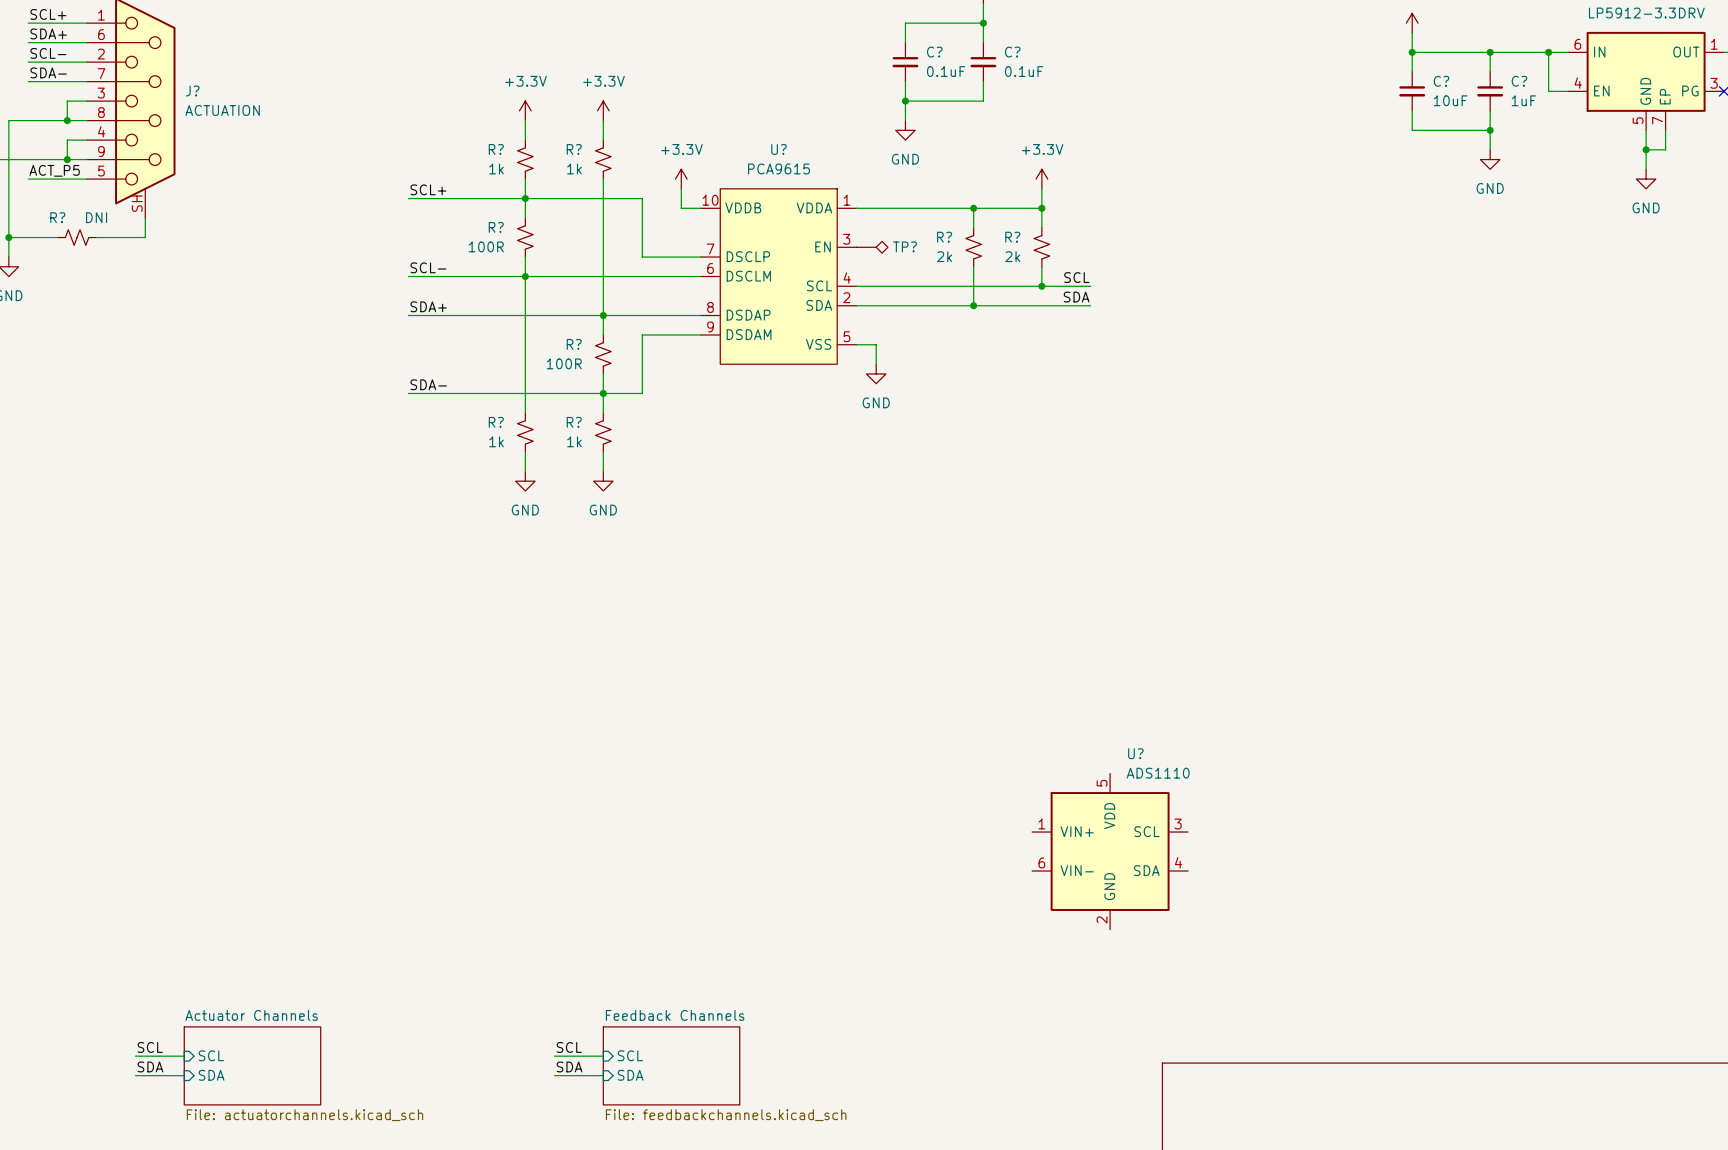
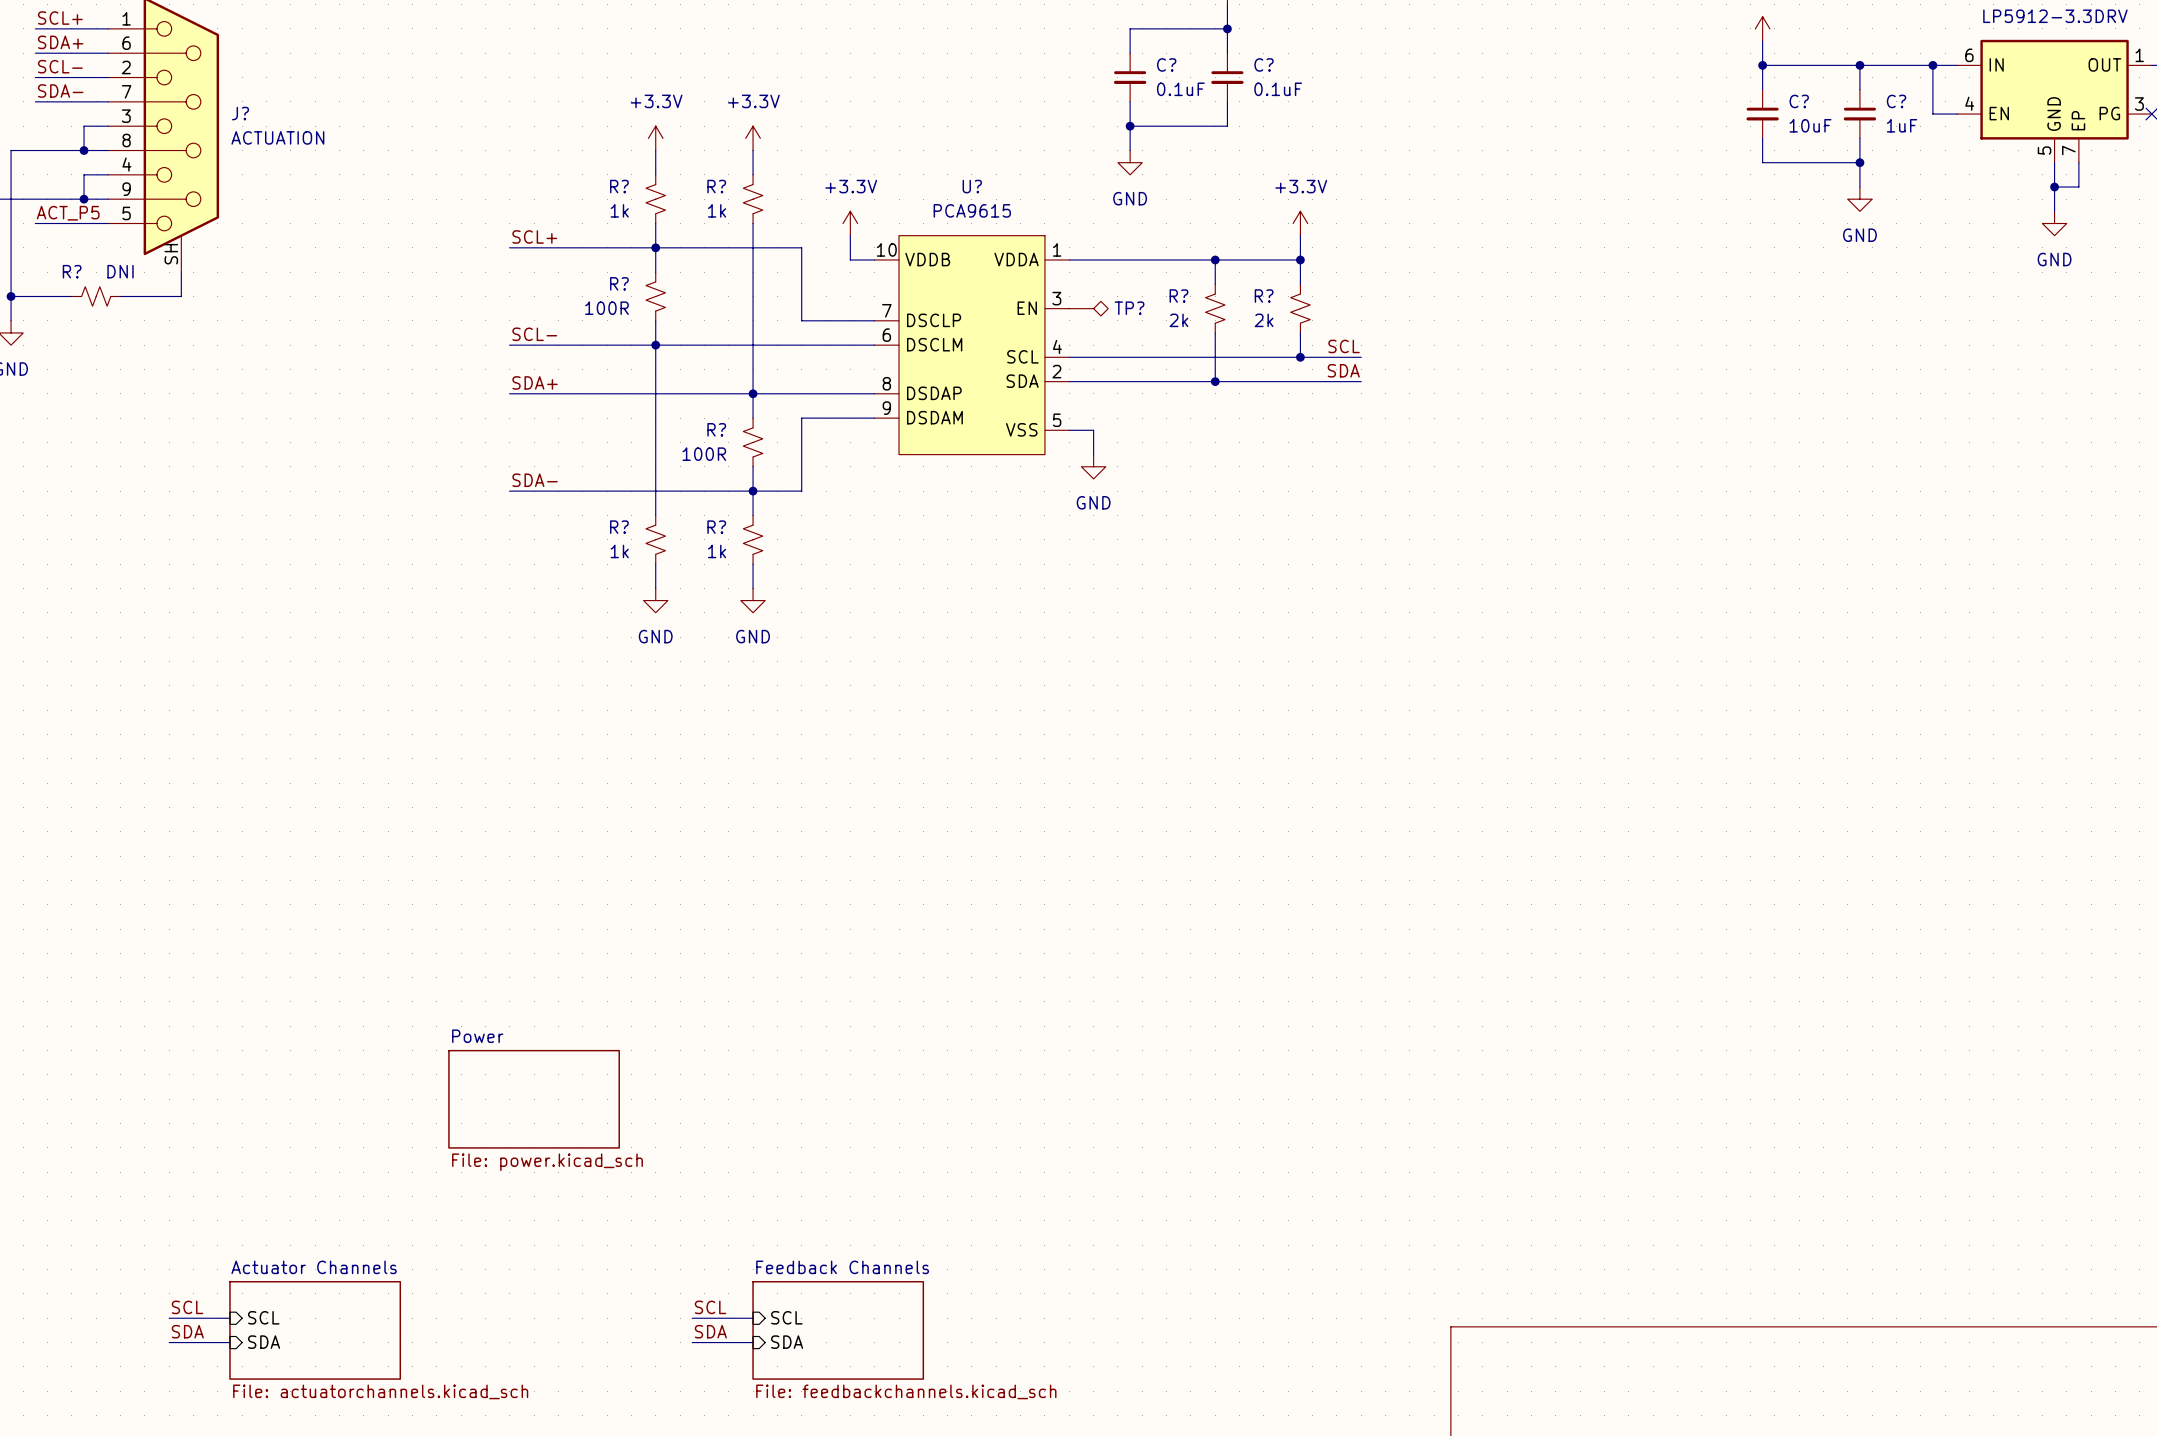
U?: ADS1110 (1110, 851) -> none
sheet Power: none -> File: power.kicad_sch (534, 1099)

